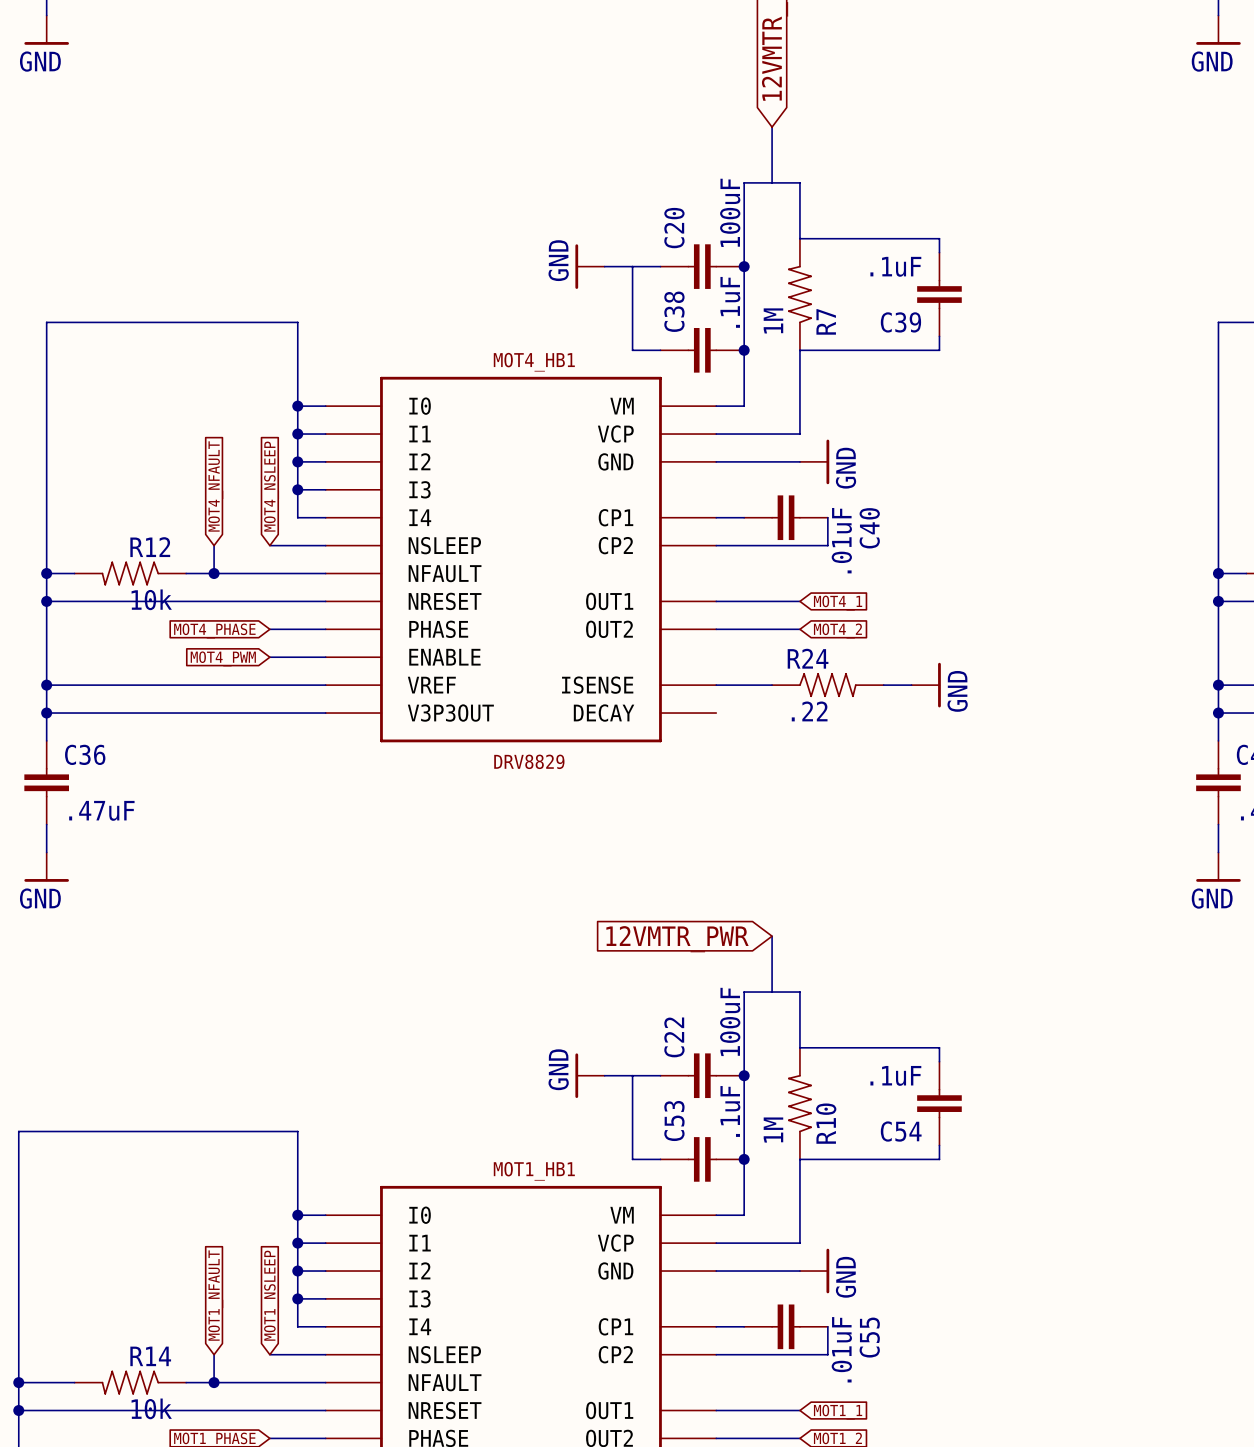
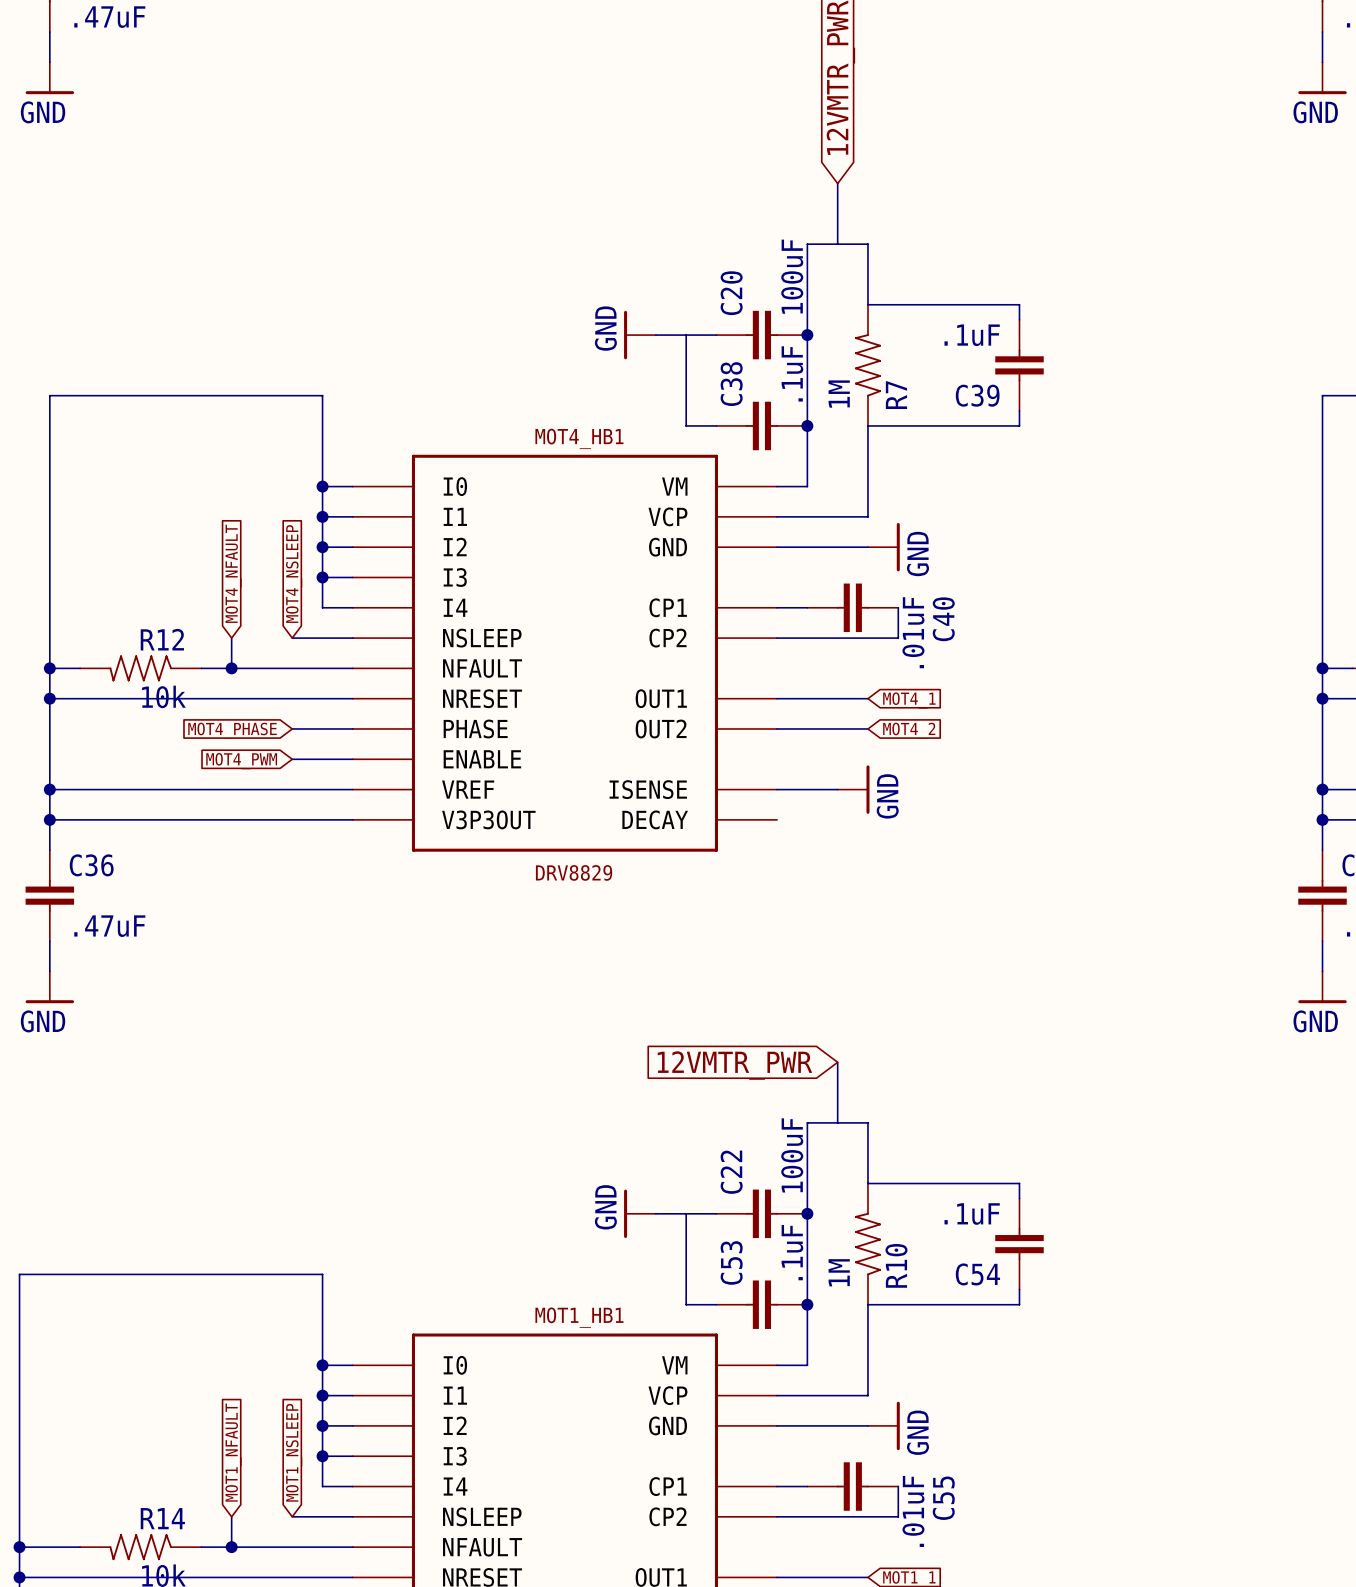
R24: .22 (827, 685) -> none
wire: (883, 685) (911, 685) -> none
power symbol position: GND (926, 685) -> GND (853, 789)

